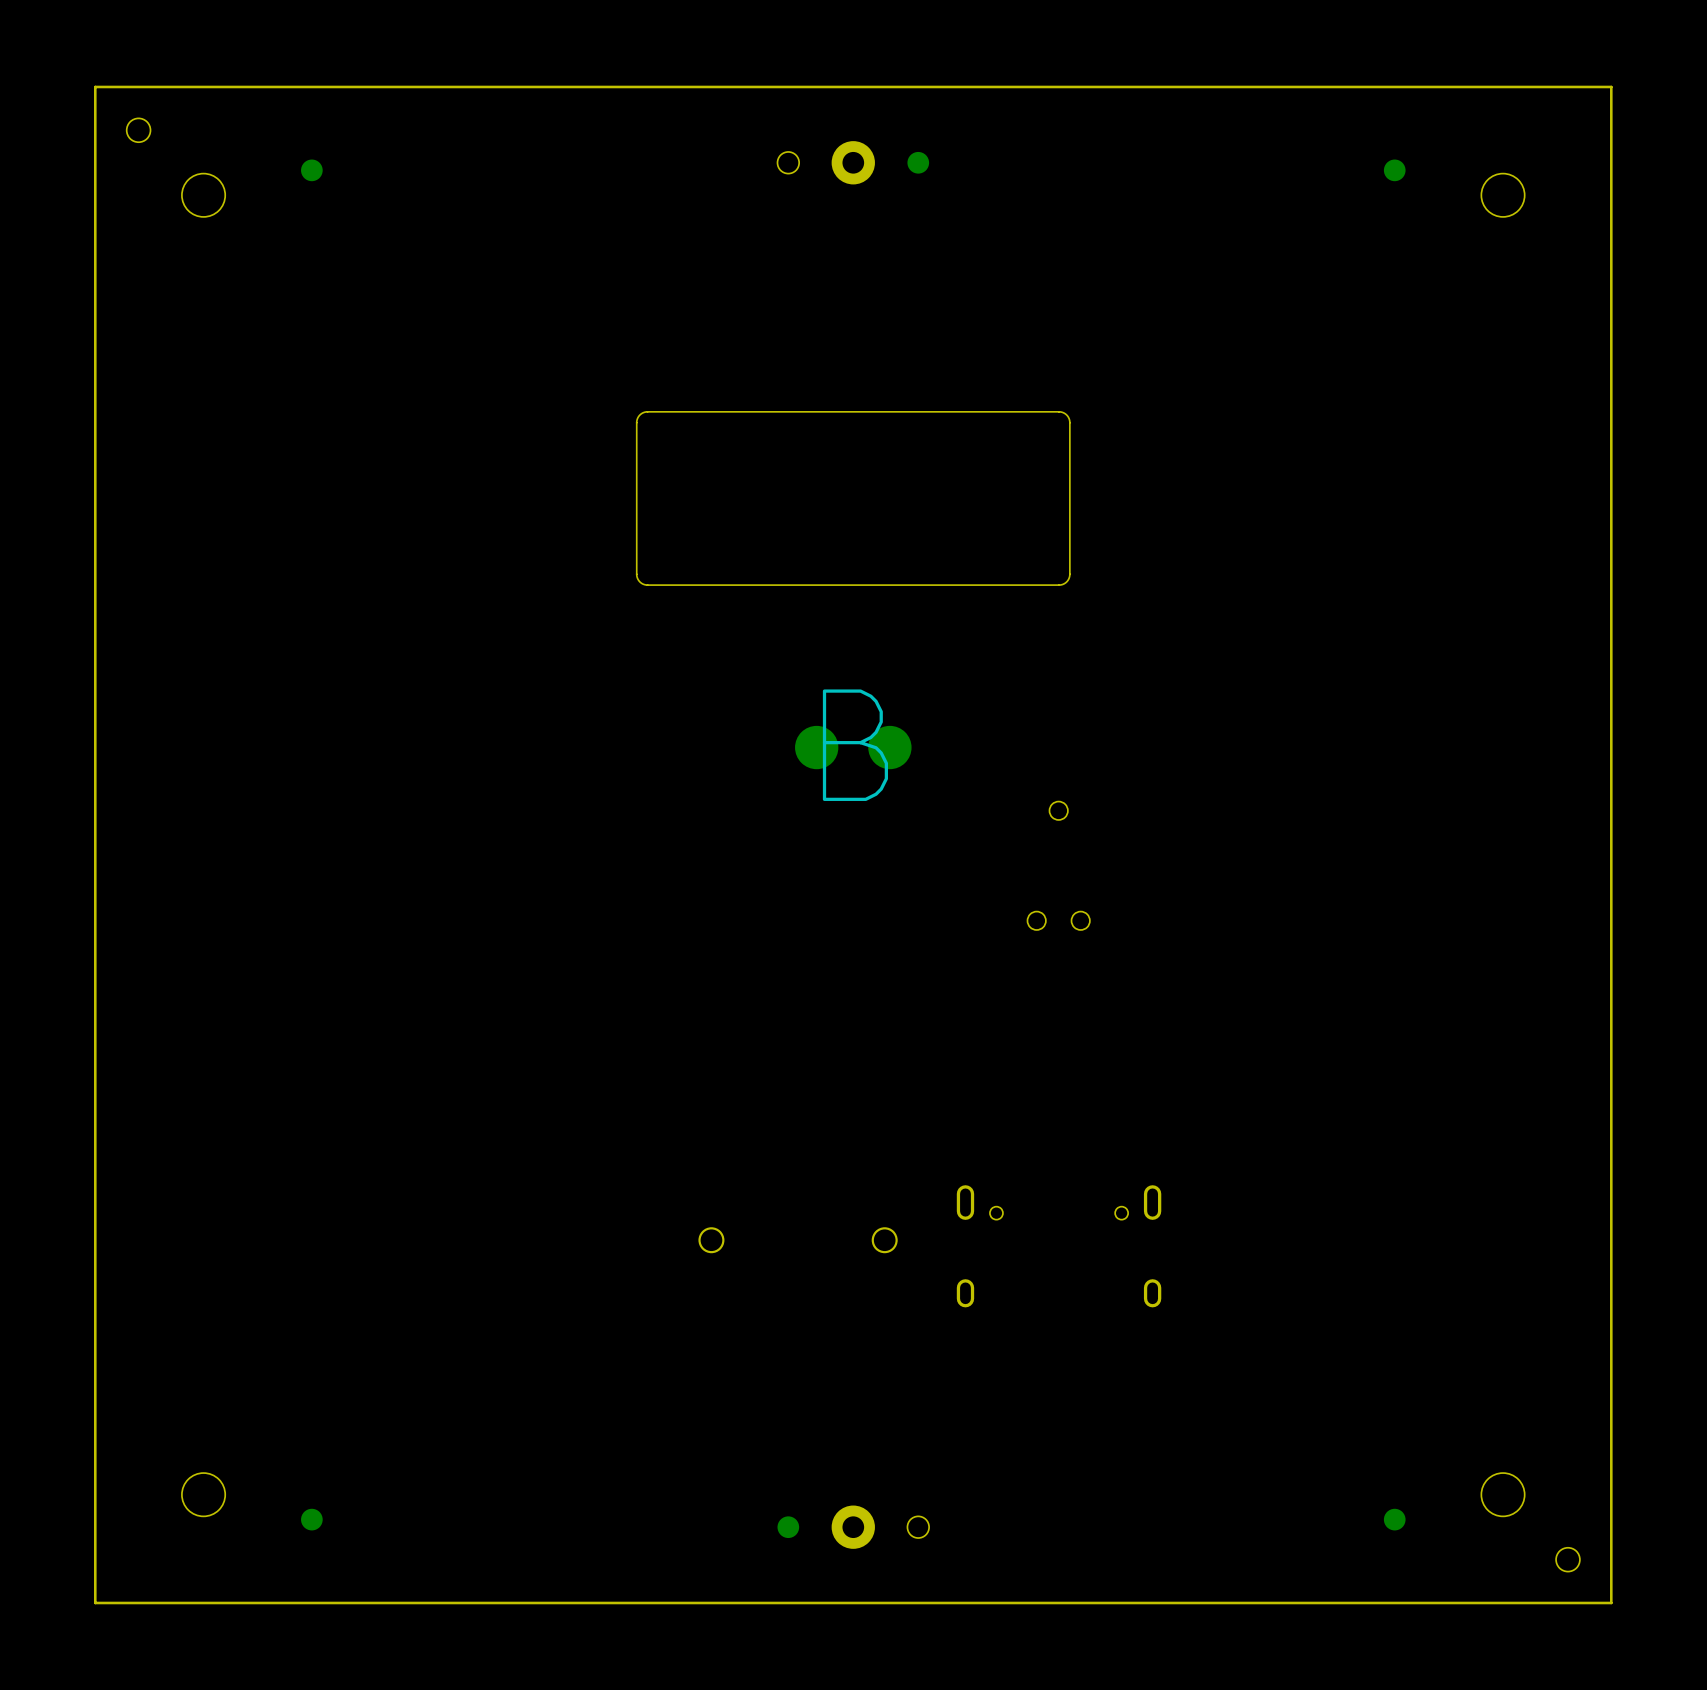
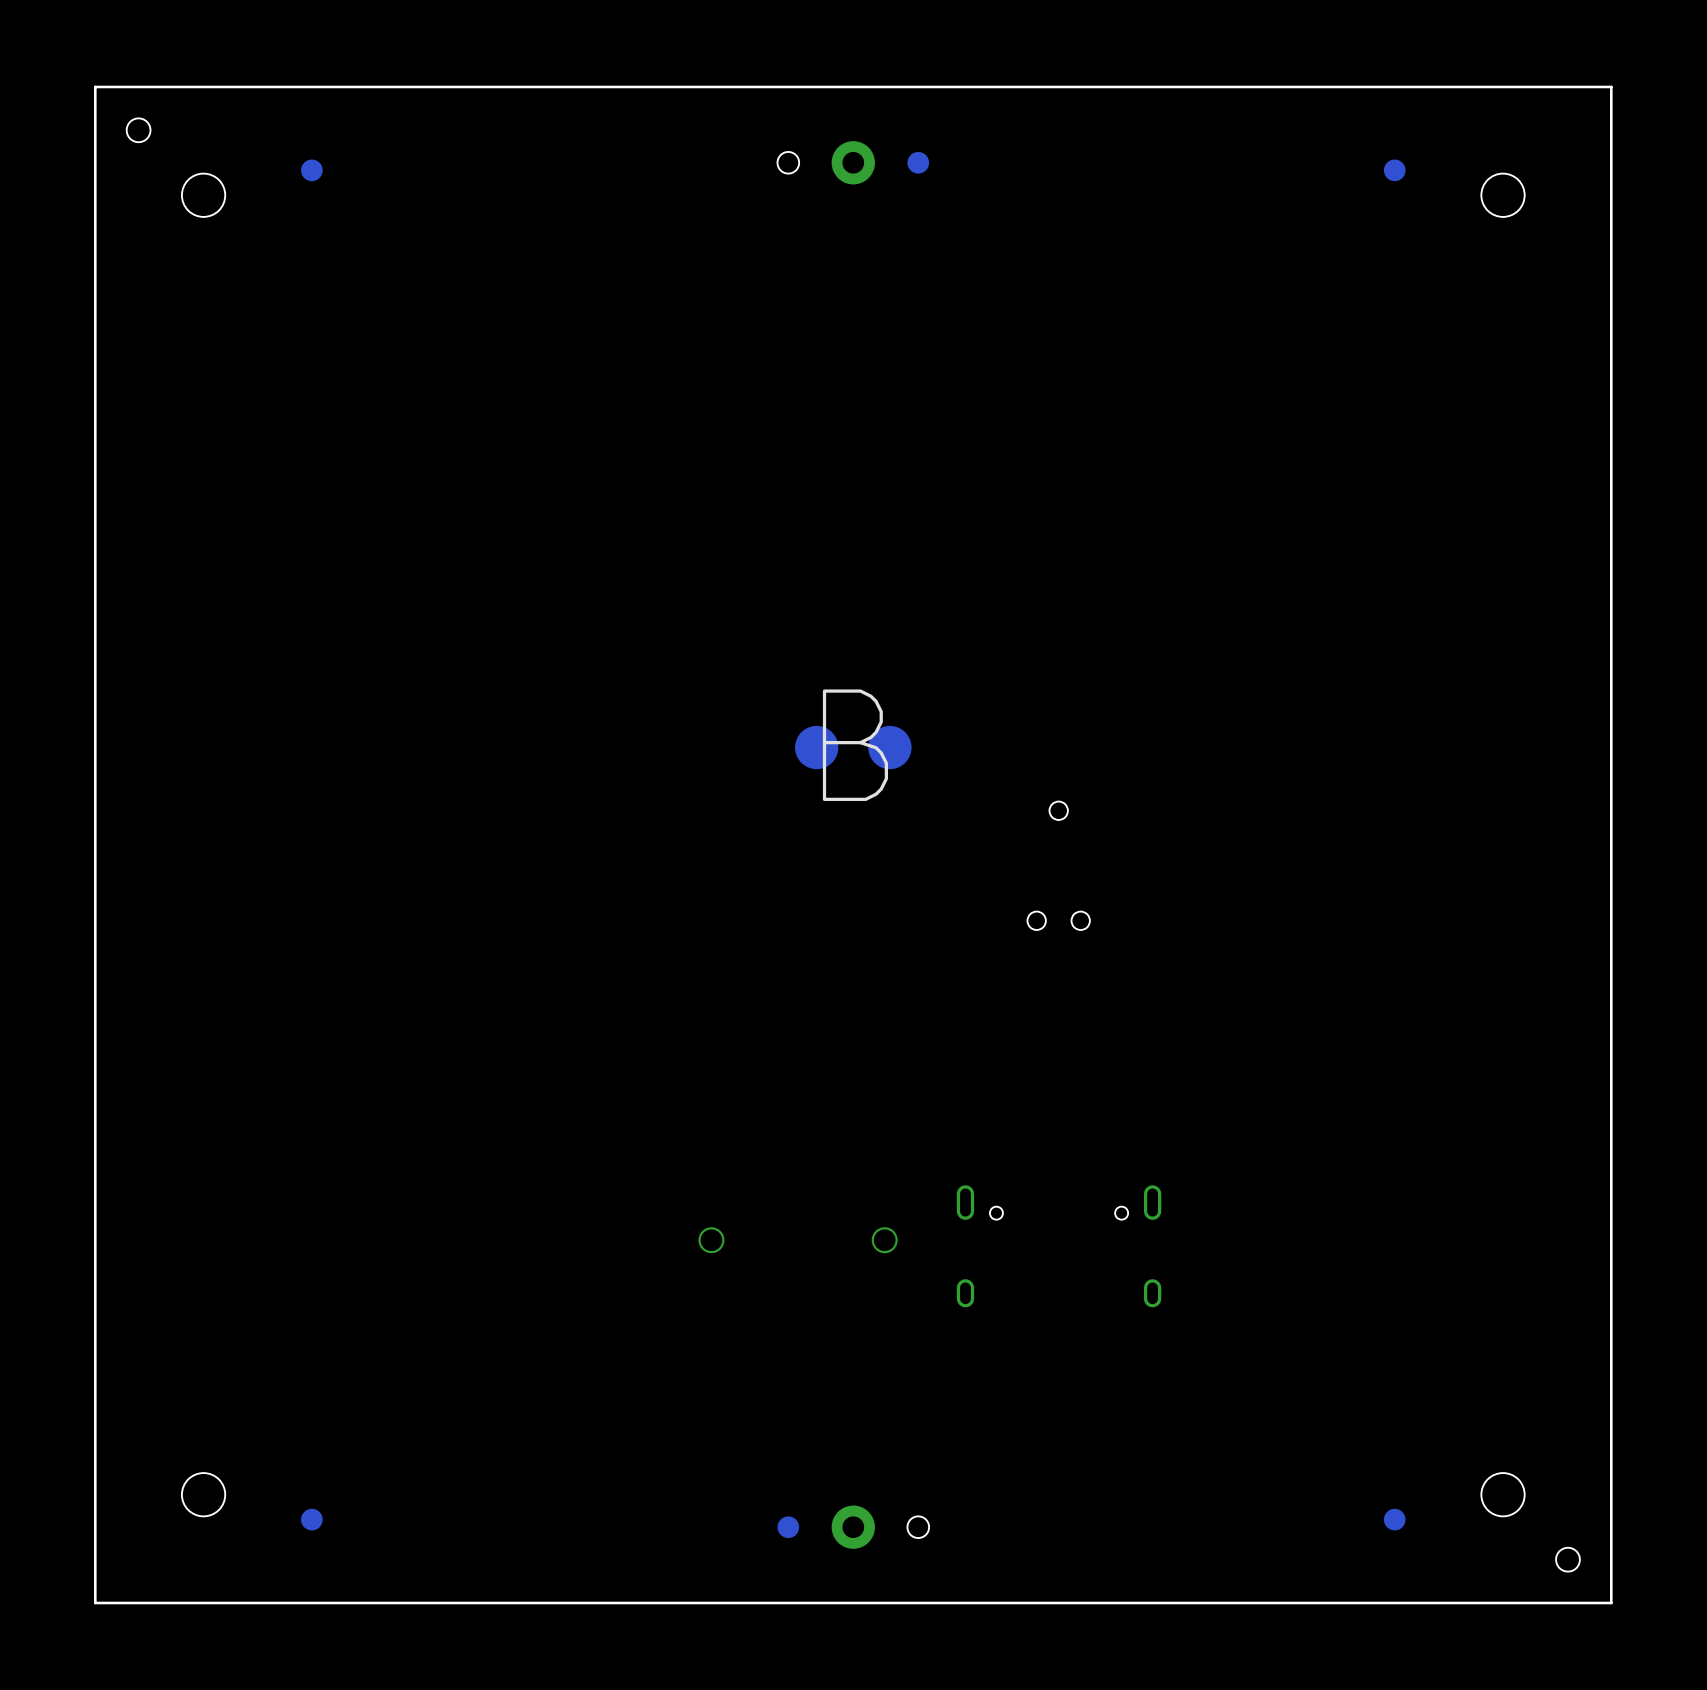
board edge: (1059, 411) (643, 412) (638, 416) (636, 422) (637, 578) (642, 583) (647, 585) (1063, 584) (1067, 580) (1069, 574) (1069, 422) (1066, 415) (1059, 411) -> none

